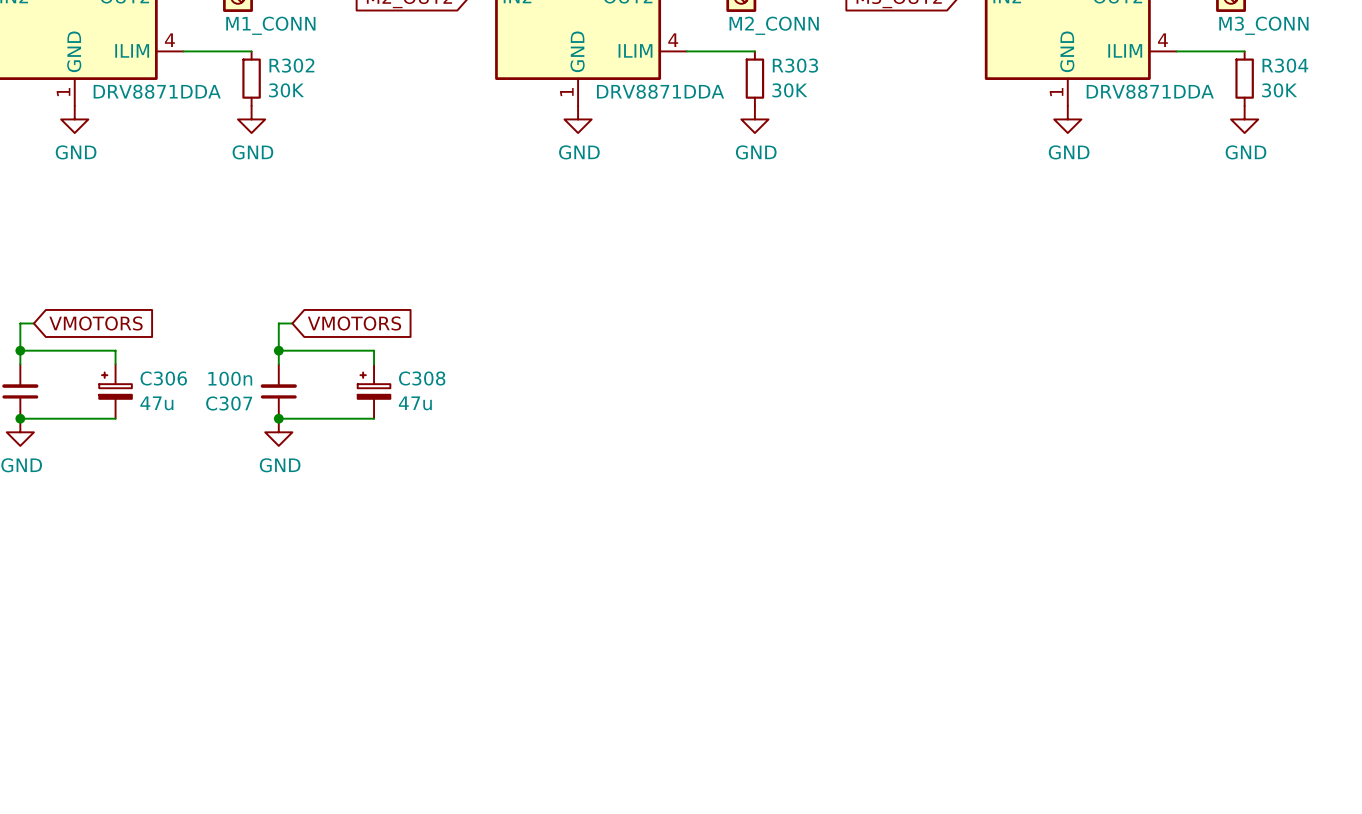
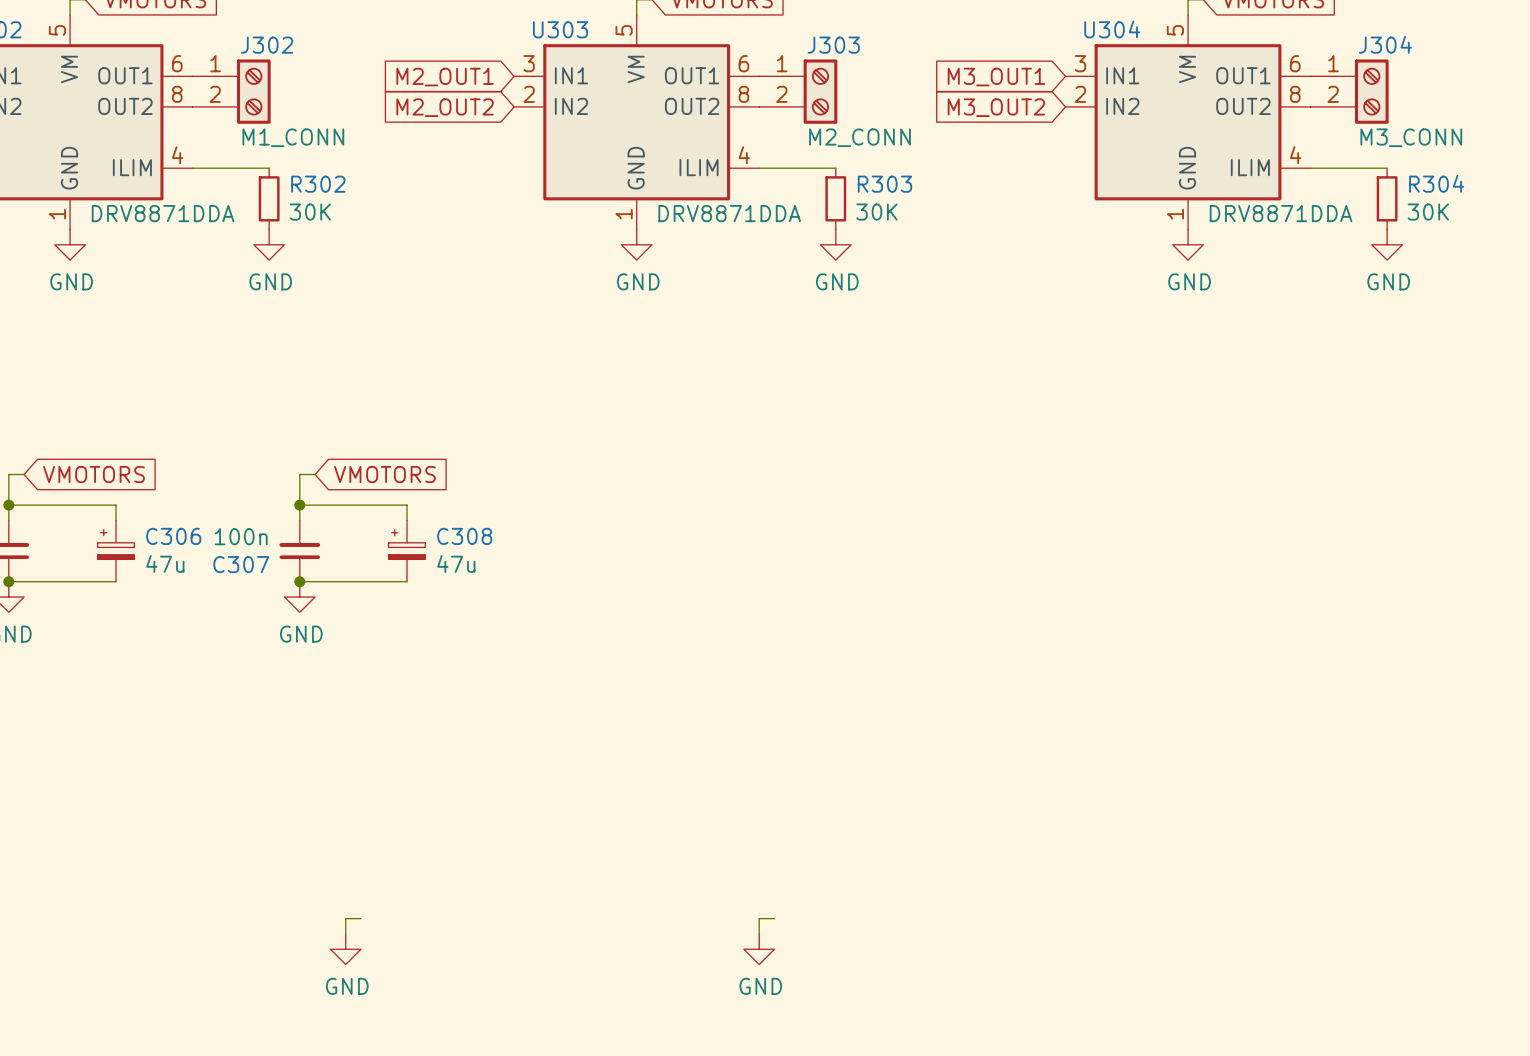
wire: none -> (361, 918) (345, 918) (345, 933)
wire: none -> (774, 918) (759, 918) (759, 933)
power symbol: none -> GND (345, 949)
power symbol: none -> GND (759, 949)

